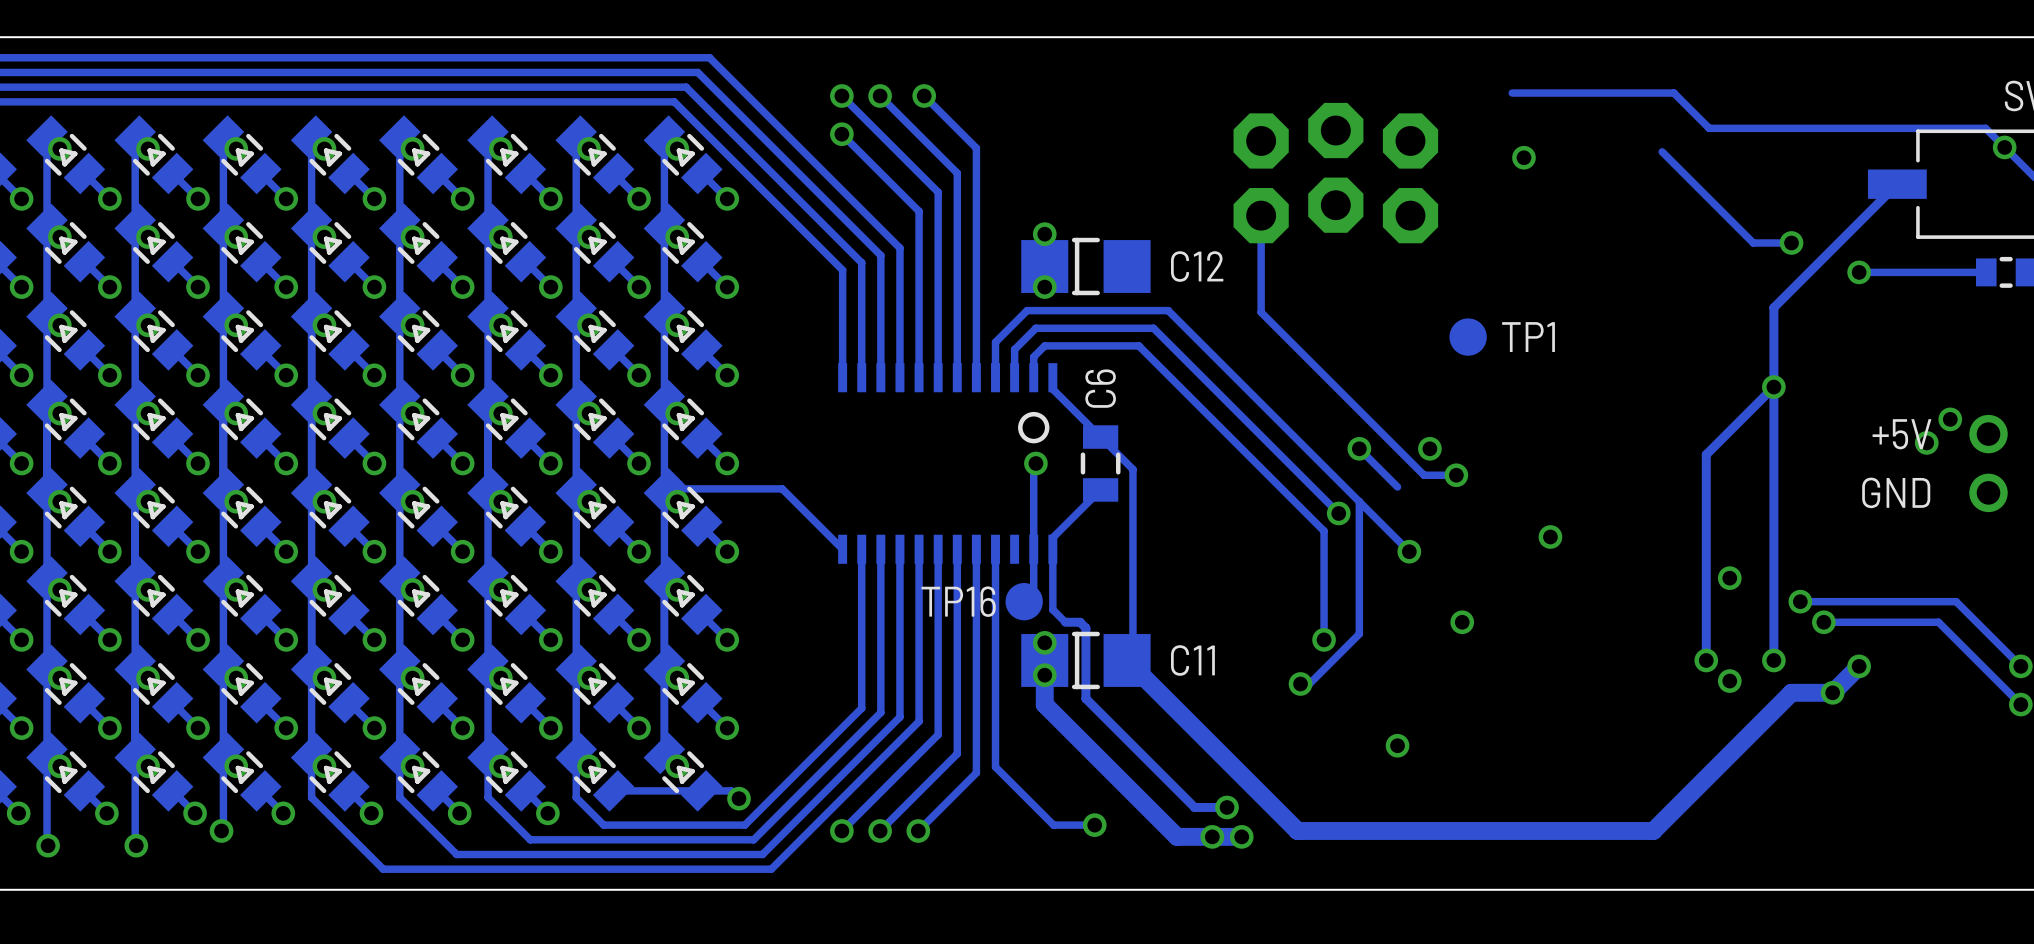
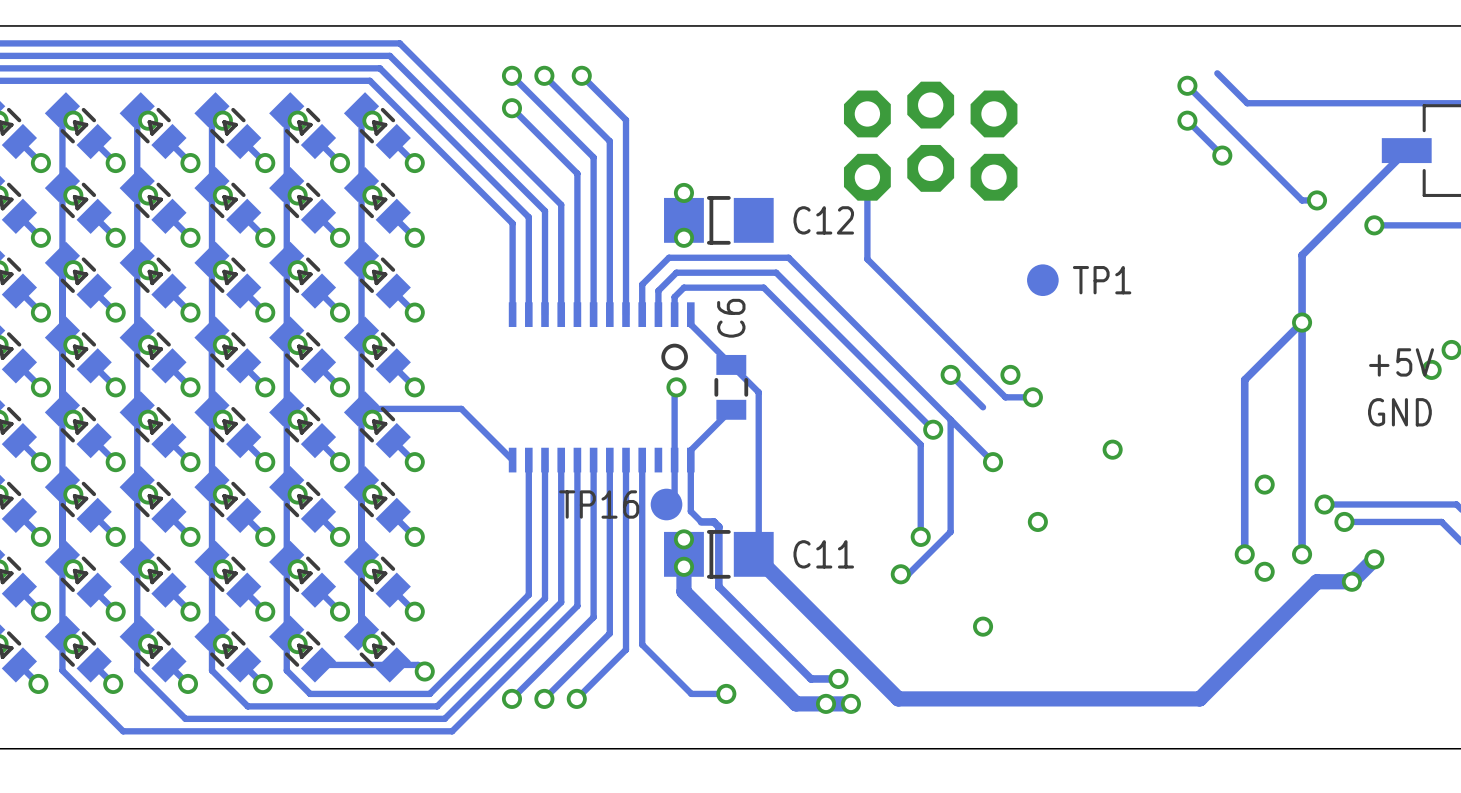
track: (1673, 93) (1512, 93) -> none
via: none -> (1187, 85)
track: none -> (1187, 120) (1222, 155)
via: none -> (1187, 120)
track: (1662, 151) (1753, 242) (1773, 242) -> (1187, 85) (1302, 200)
via: (1523, 157) -> none
via: none -> (1222, 155)

